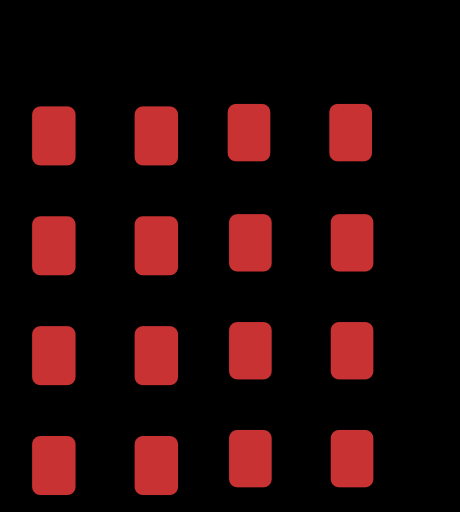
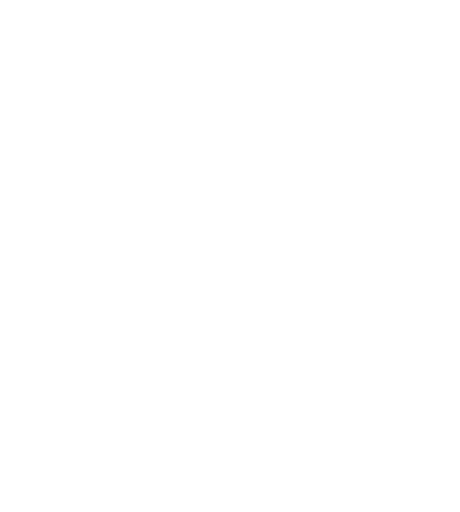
part: (299, 132) -> none
part: (105, 135) -> none
part: (301, 242) -> none
part: (105, 245) -> none
part: (301, 350) -> none
part: (105, 355) -> none
part: (301, 458) -> none
part: (105, 465) -> none

